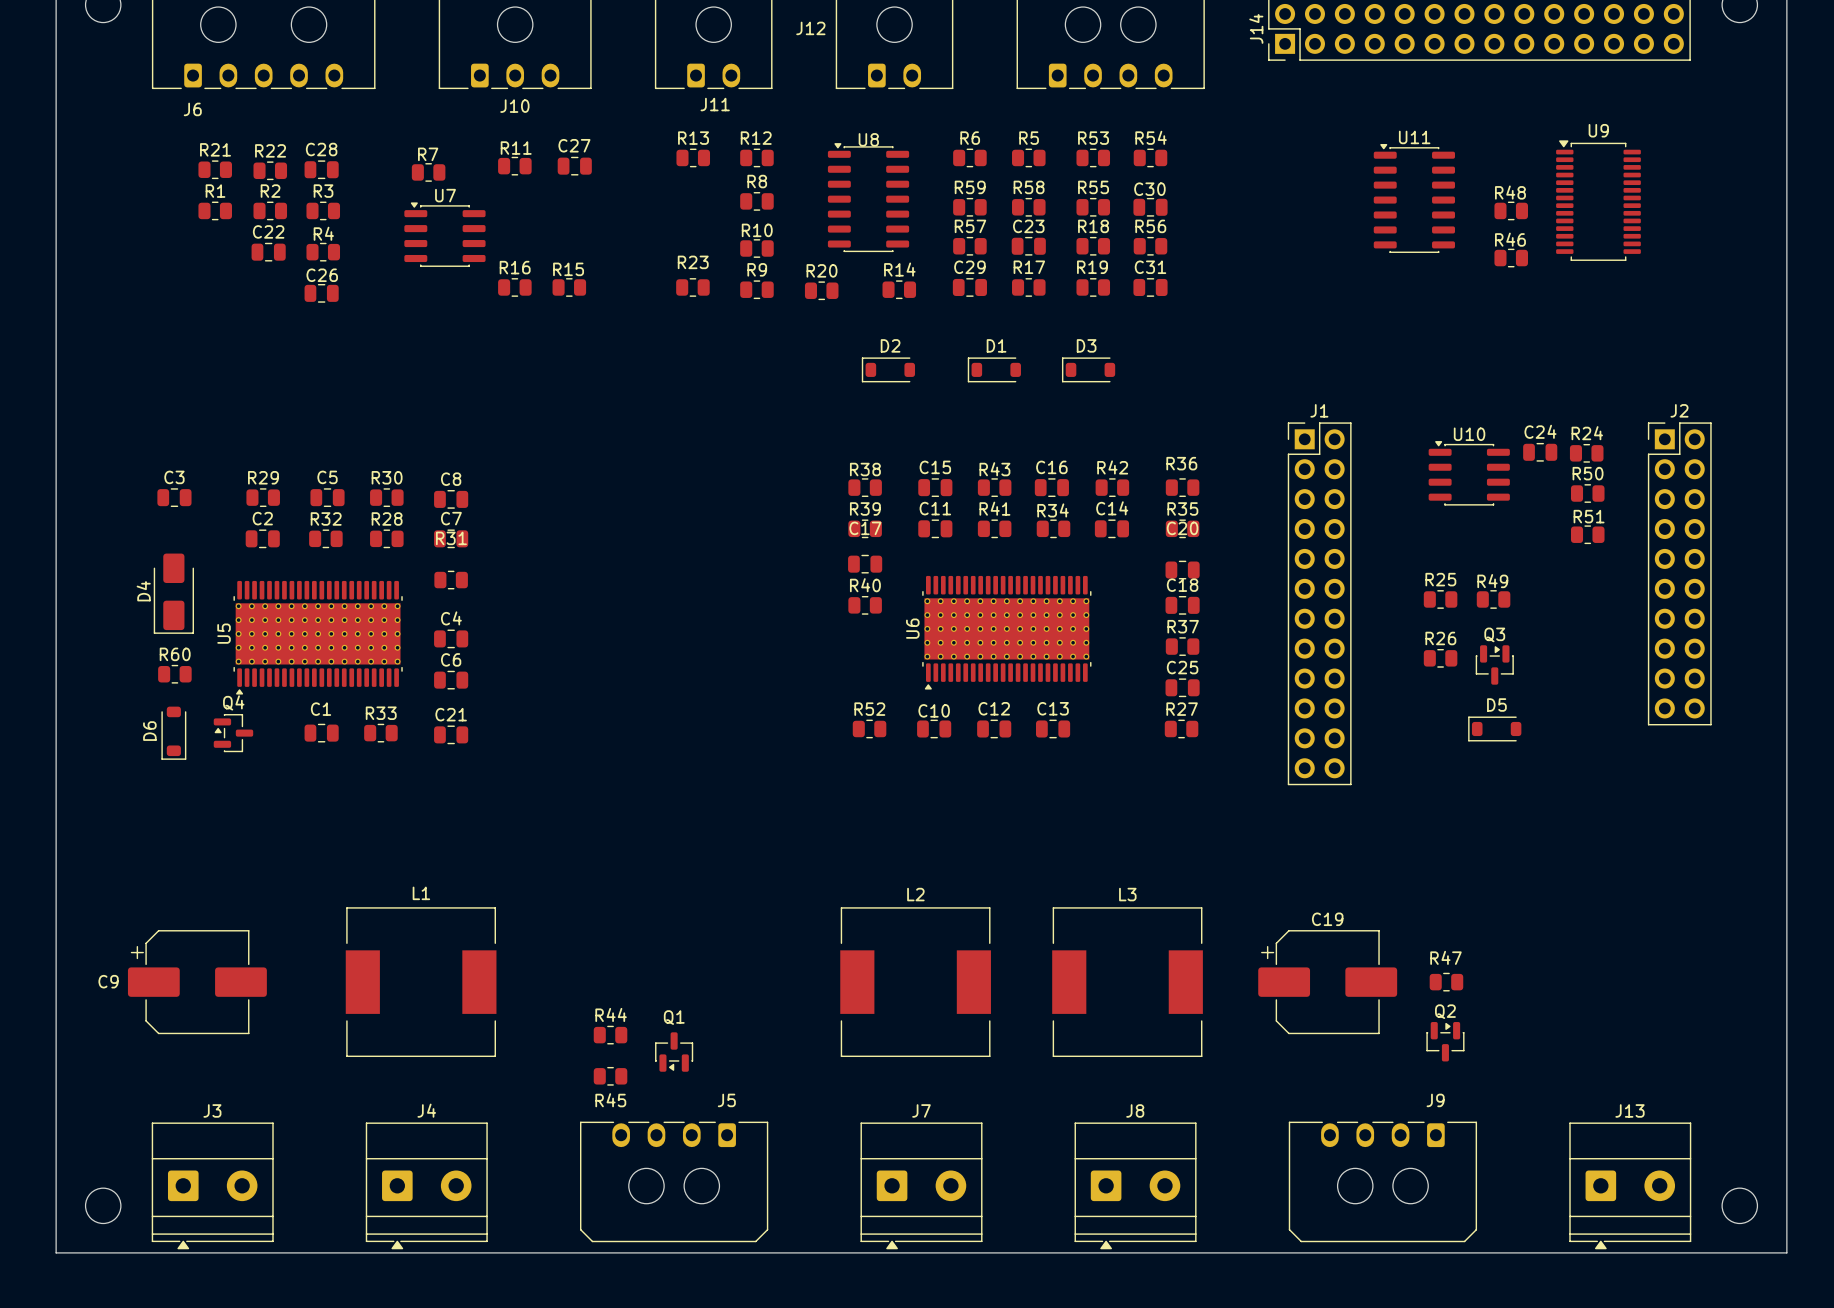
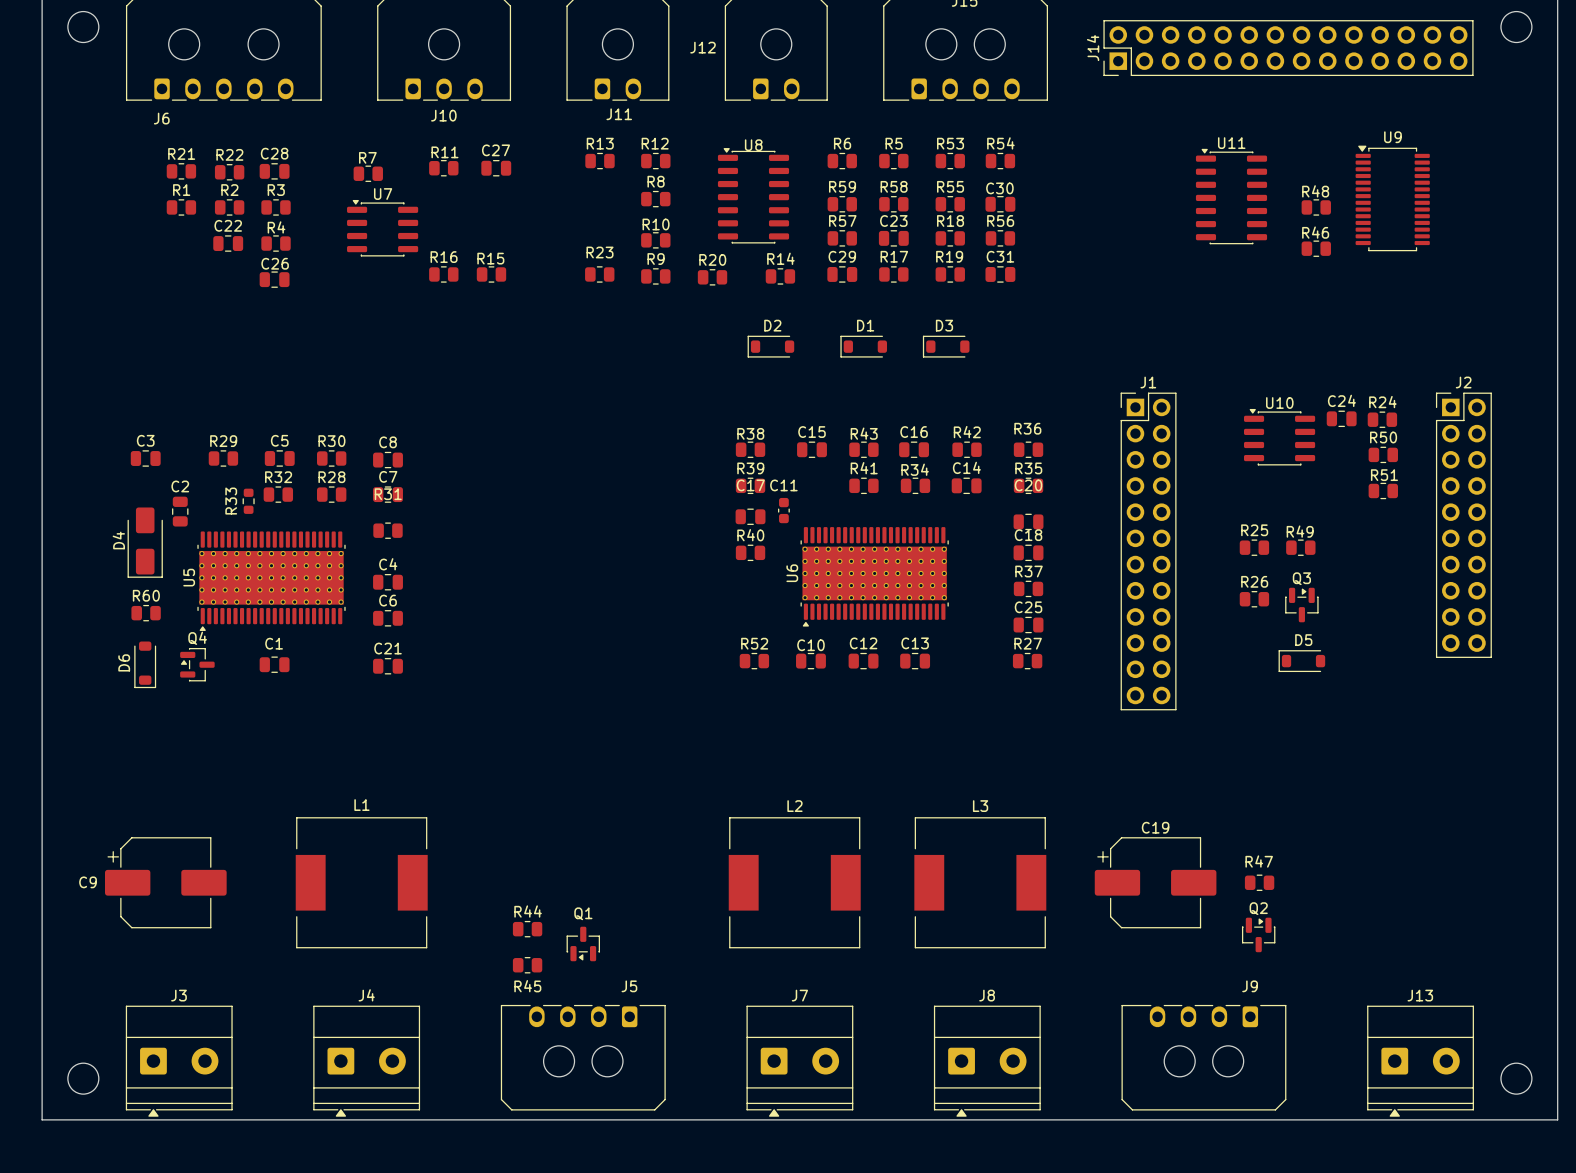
C11 footprint: [918, 519, 953, 539] -> [778, 497, 790, 524]
C2 rotation: 0° (262, 538) -> 90° clockwise (180, 511)
C2 position: (262, 538) -> (180, 511)
R33 name position: R33 (381, 713) -> R33 (231, 501)
R33 footprint: [364, 723, 398, 743] -> [242, 488, 255, 514]

